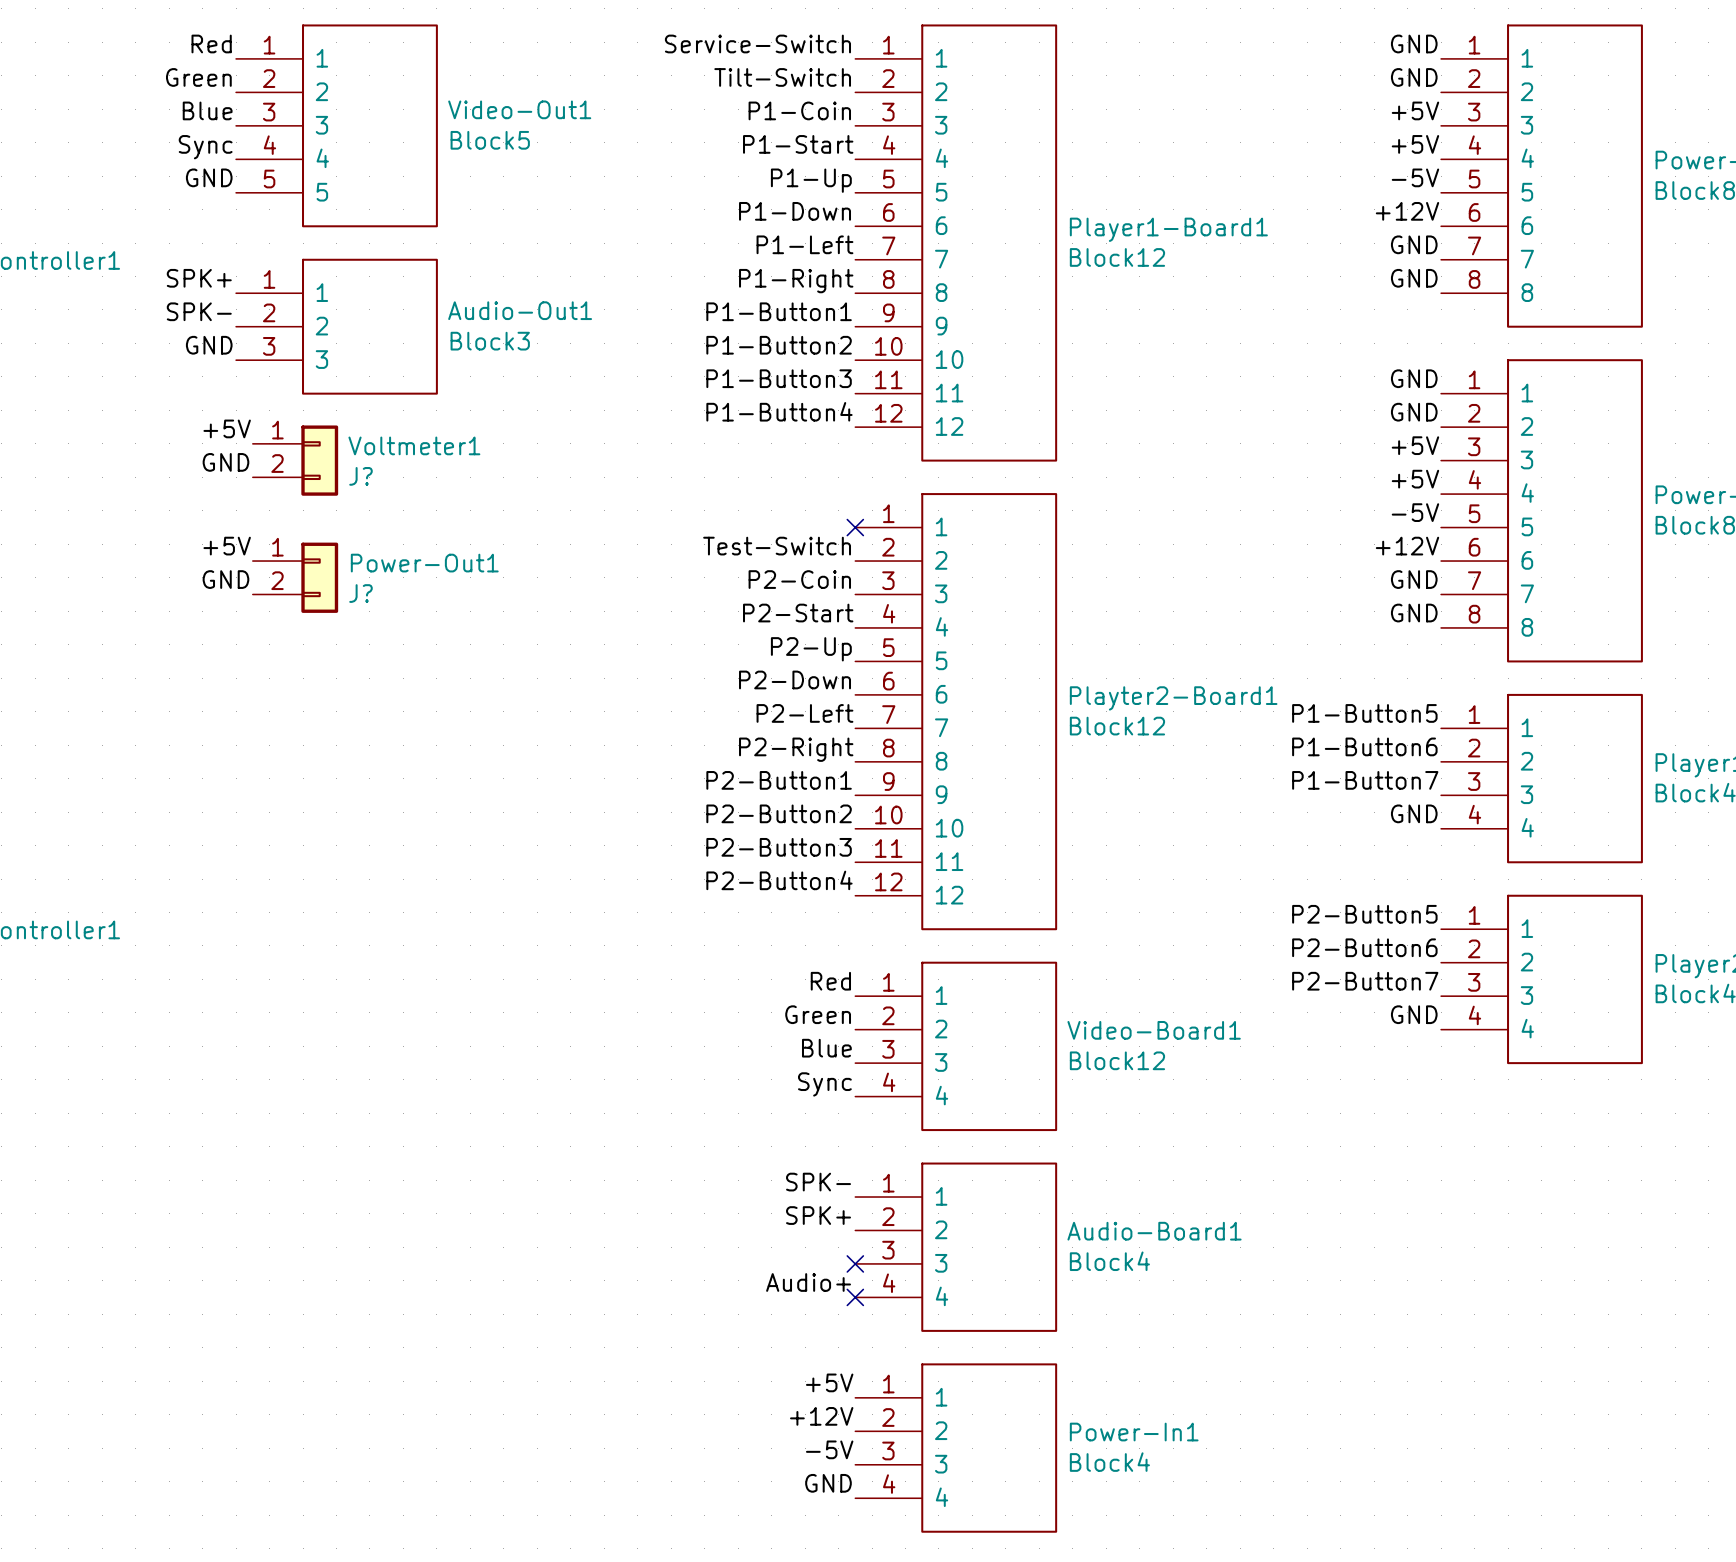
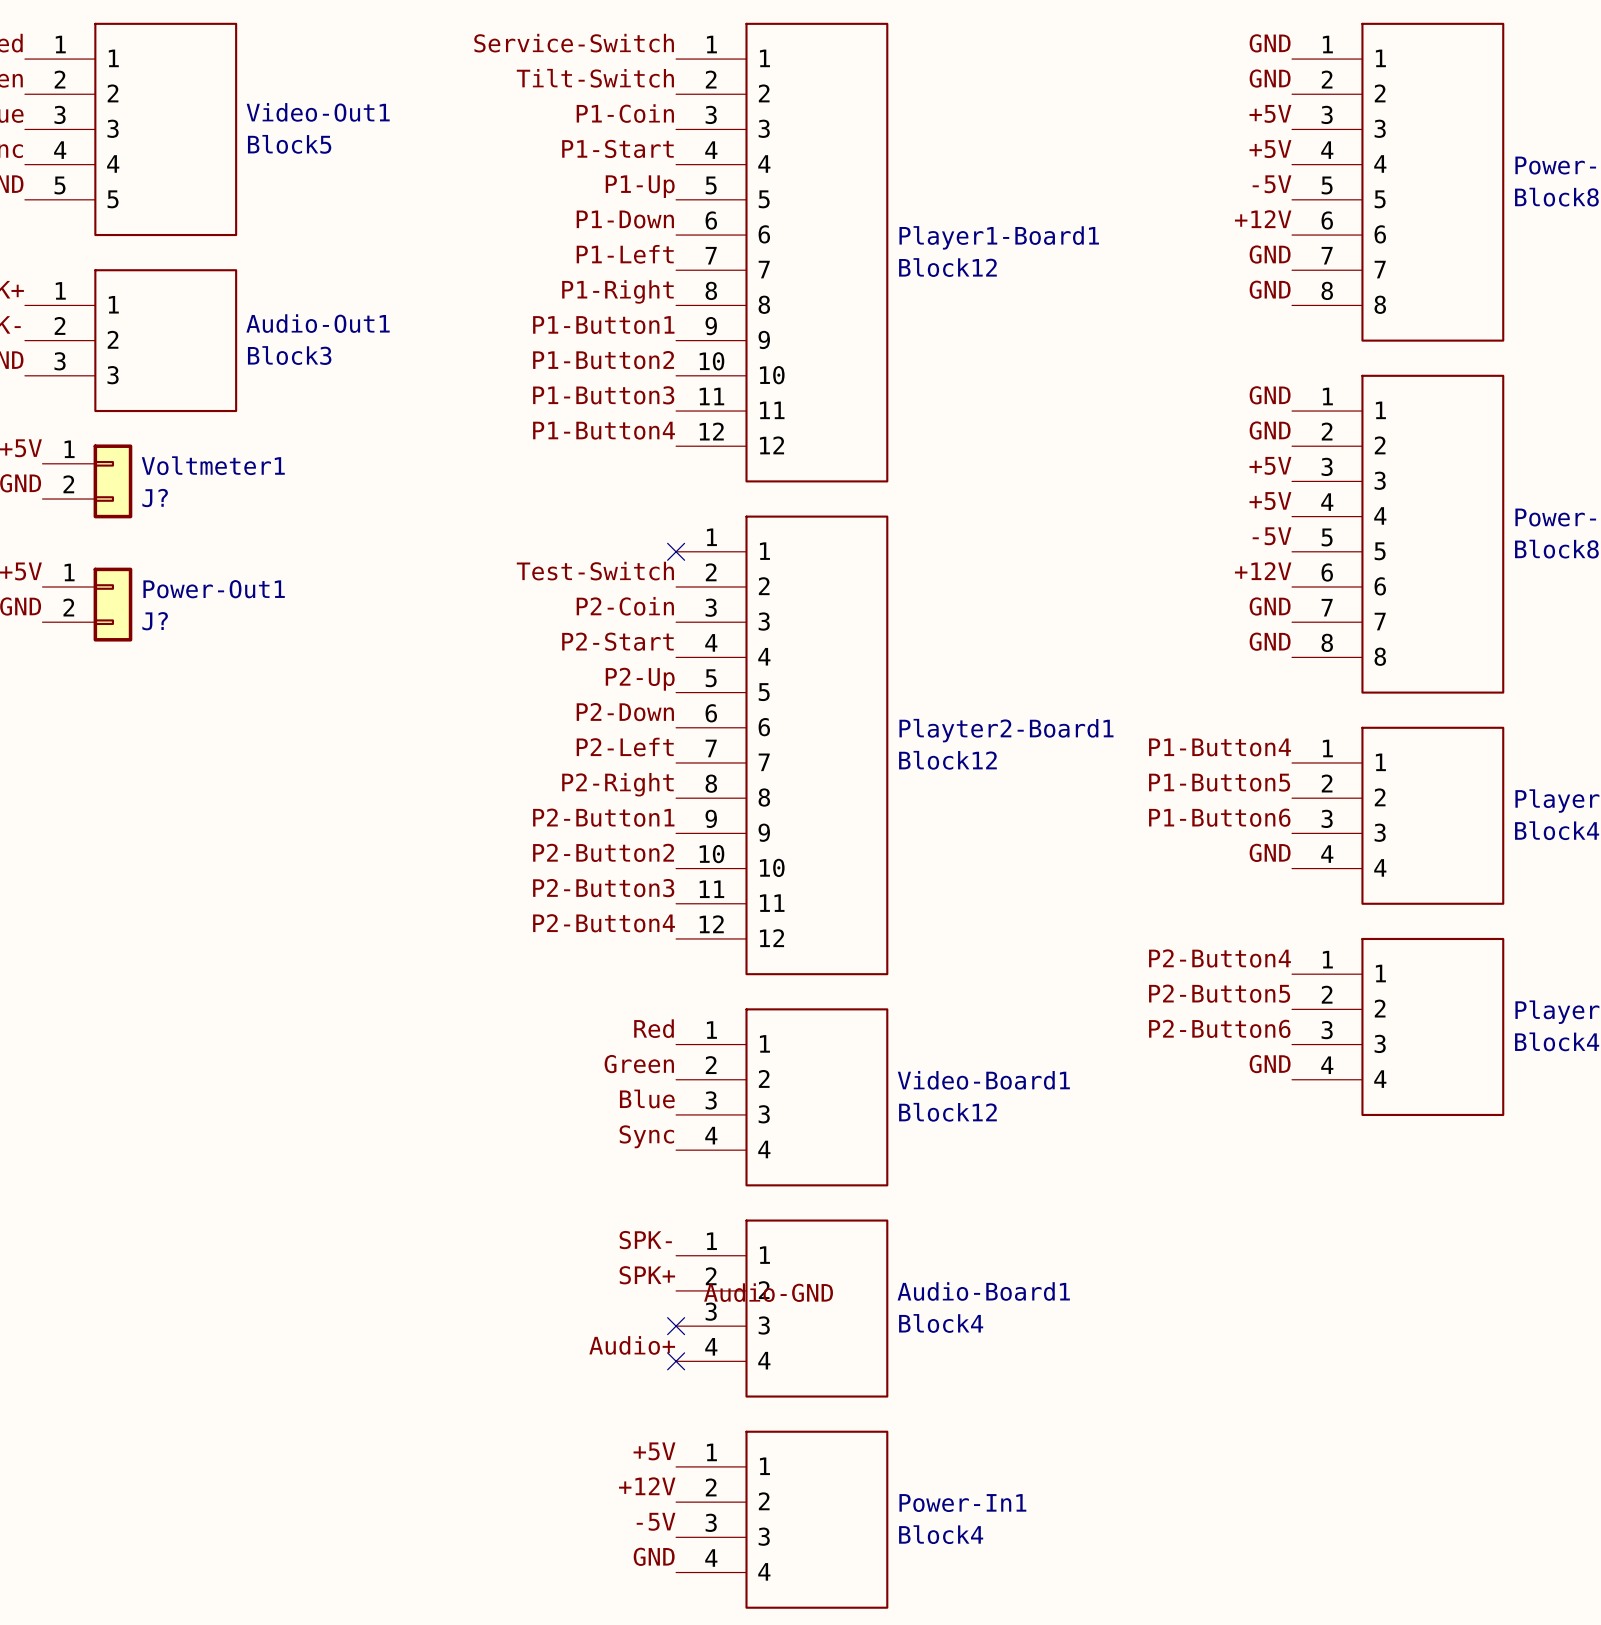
label: P1-Button5 (1364, 713) -> P1-Button4 (1219, 747)
label: P1-Button6 (1364, 746) -> P1-Button5 (1219, 782)
label: P1-Button7 (1365, 780) -> P1-Button6 (1219, 817)
label: P2-Button5 (1364, 914) -> P2-Button4 (1219, 958)
label: P2-Button6 (1364, 947) -> P2-Button5 (1219, 993)
label: P2-Button7 (1365, 981) -> P2-Button6 (1219, 1028)
label: none -> Audio-GND (768, 1292)

